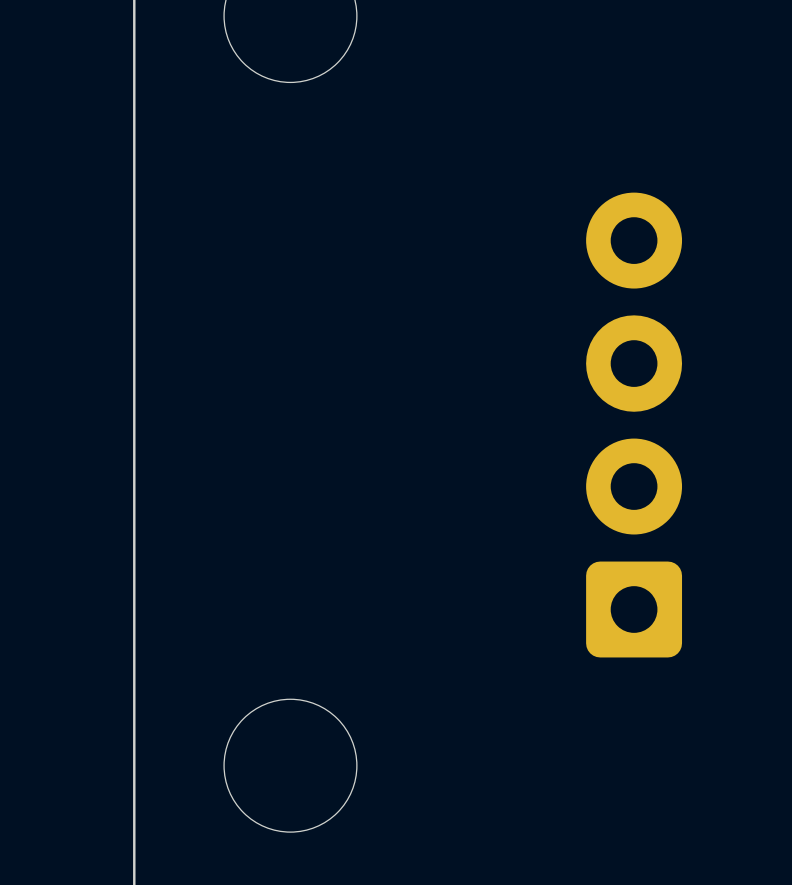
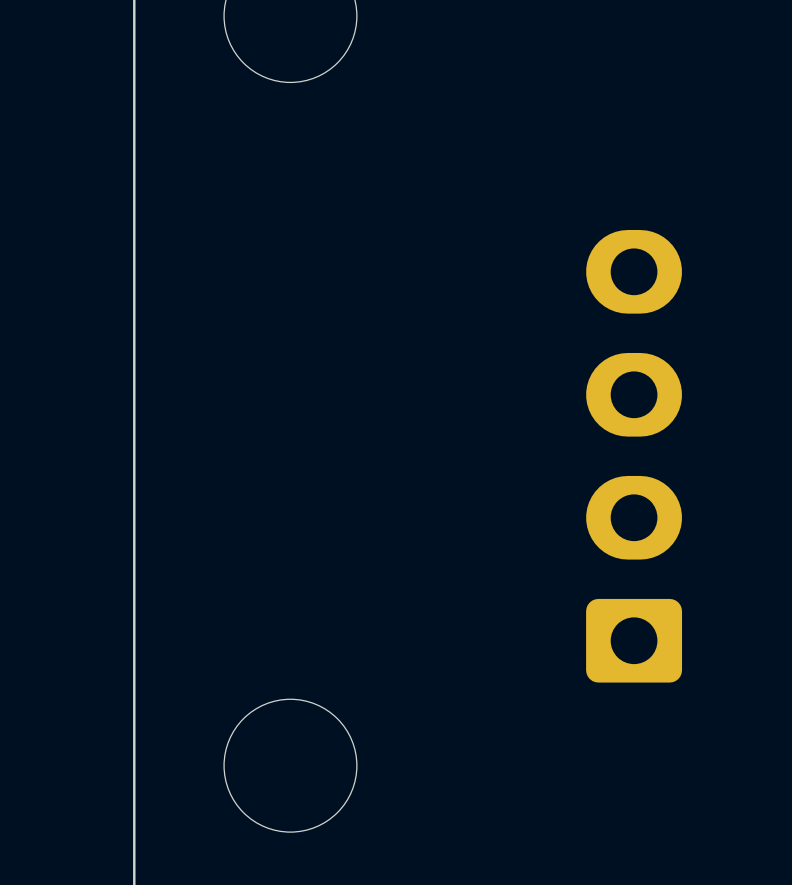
part footprint: [586, 192, 683, 658] -> [586, 230, 683, 683]

